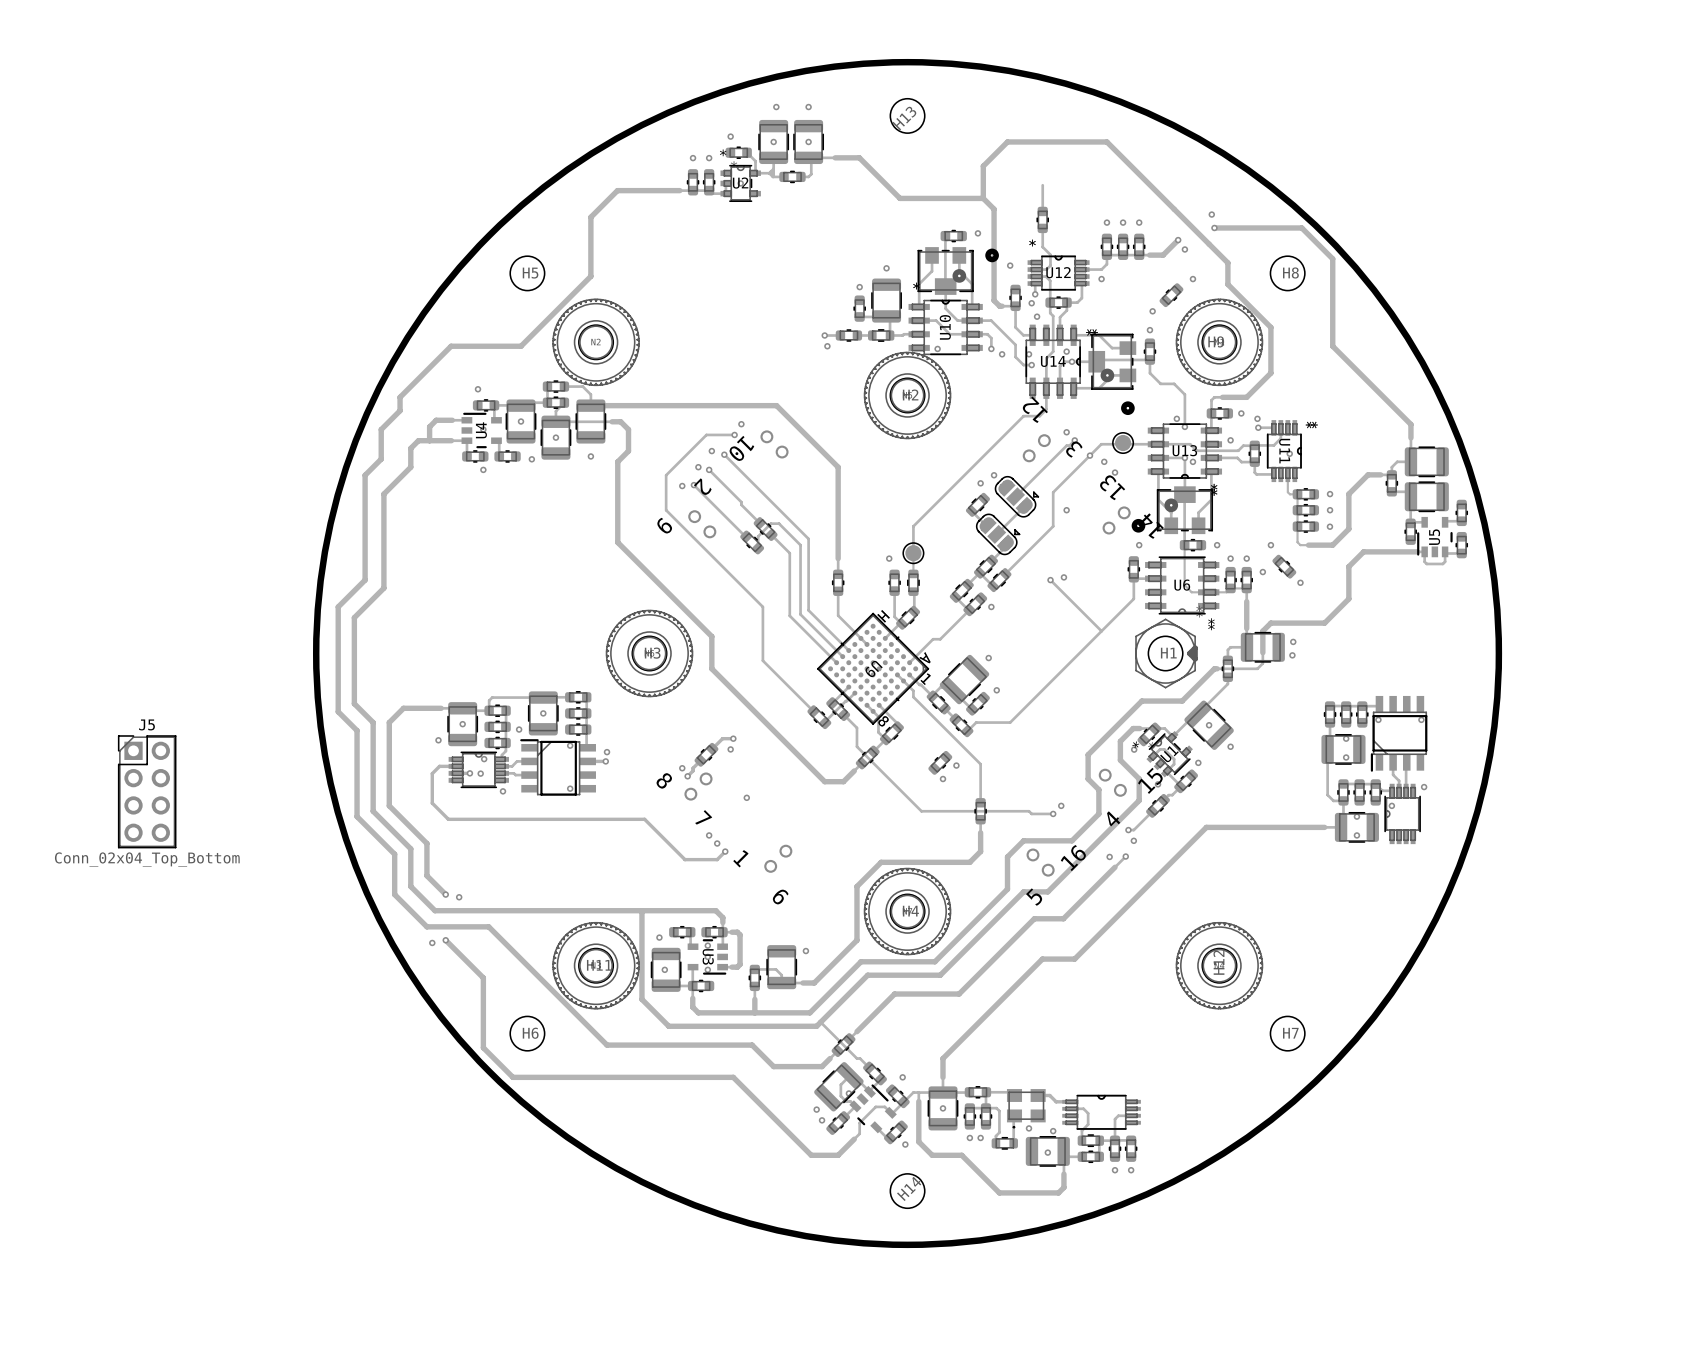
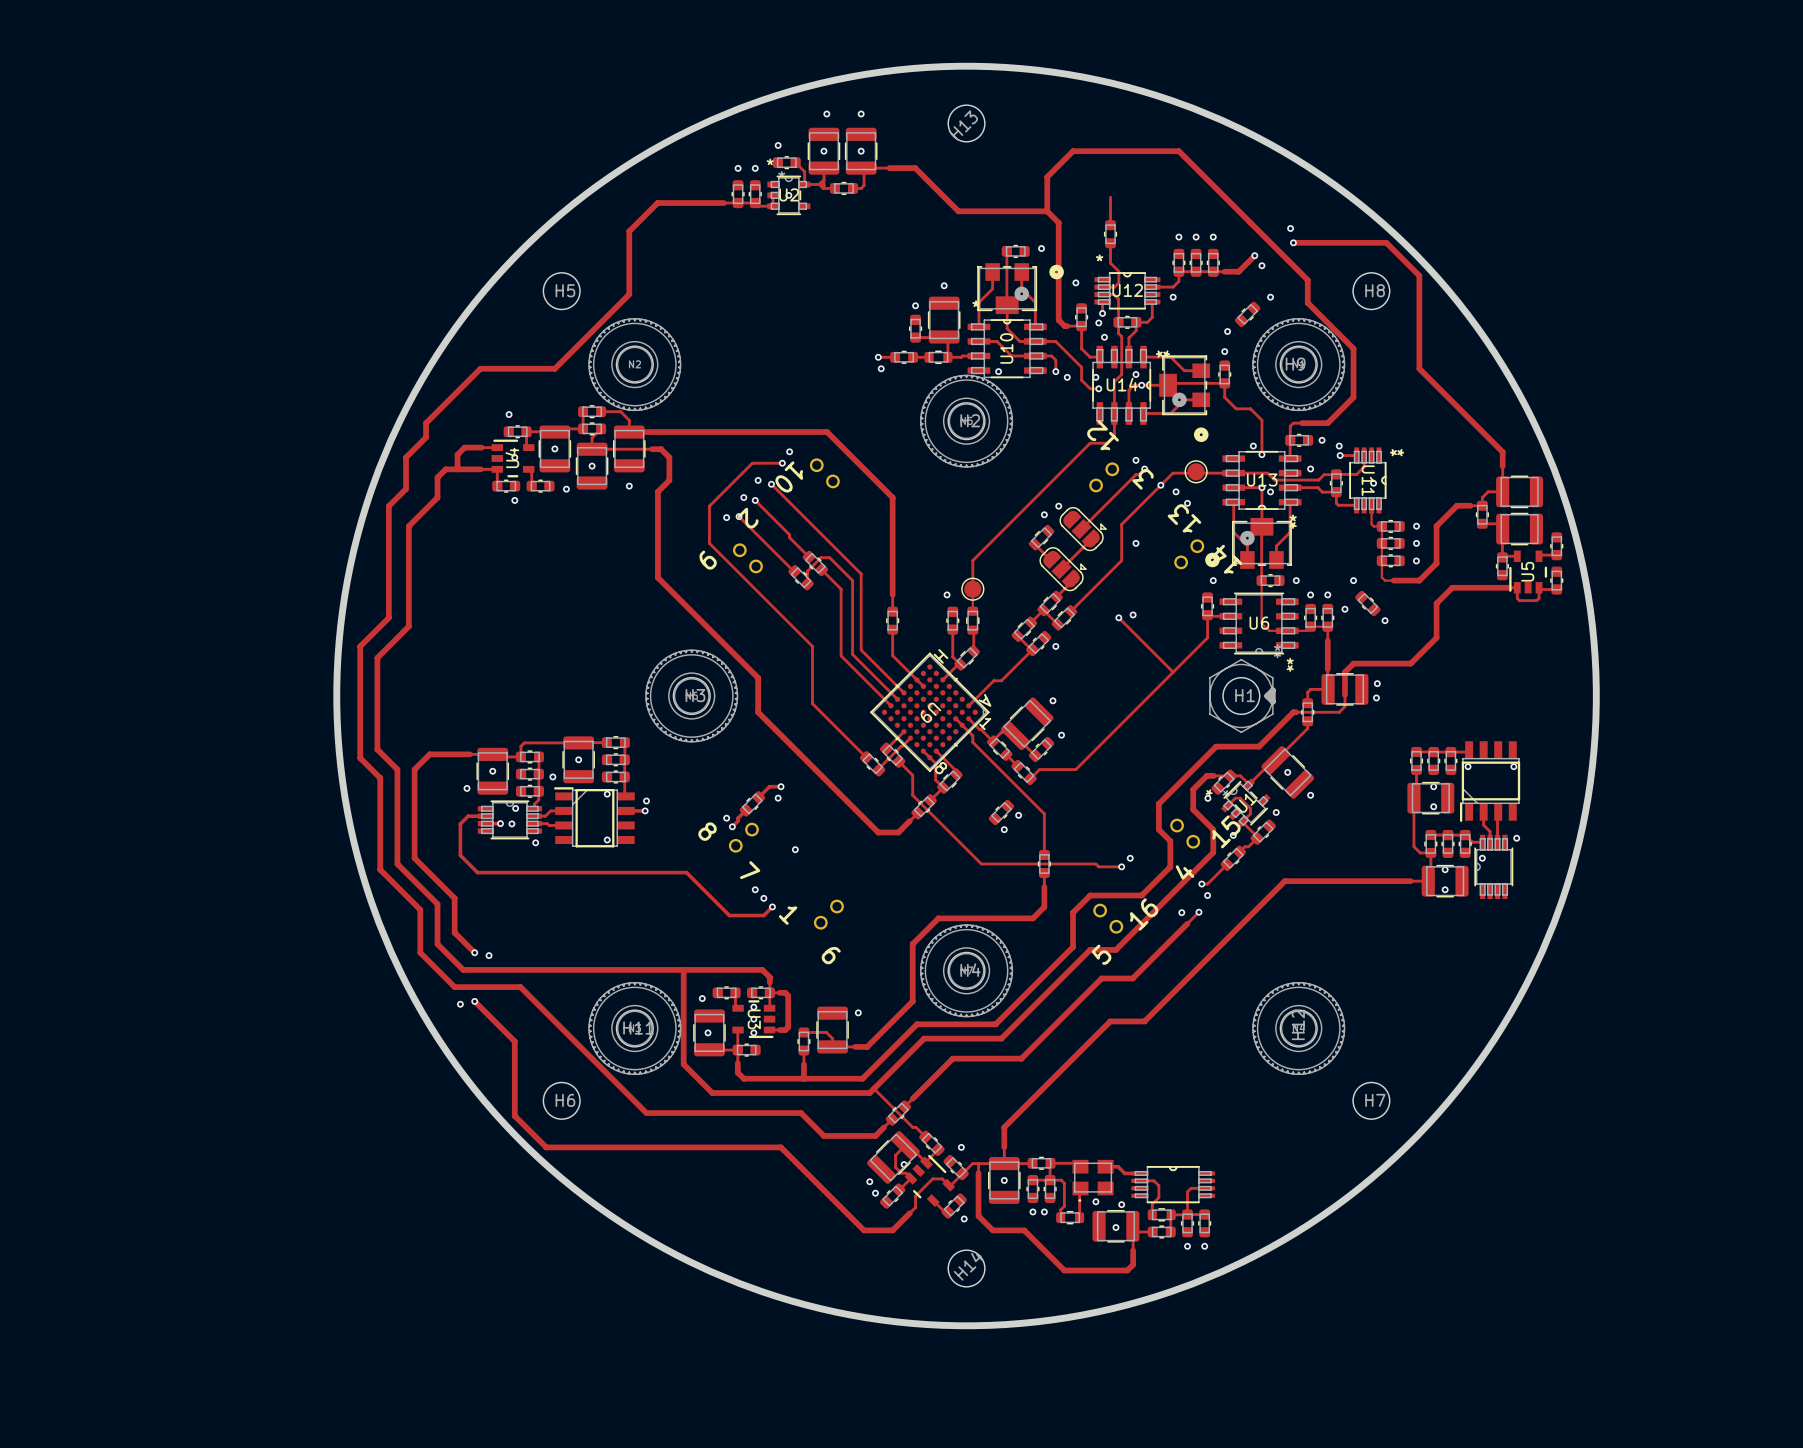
J5: Conn_02x04_Top_Bottom (147, 791) -> none

